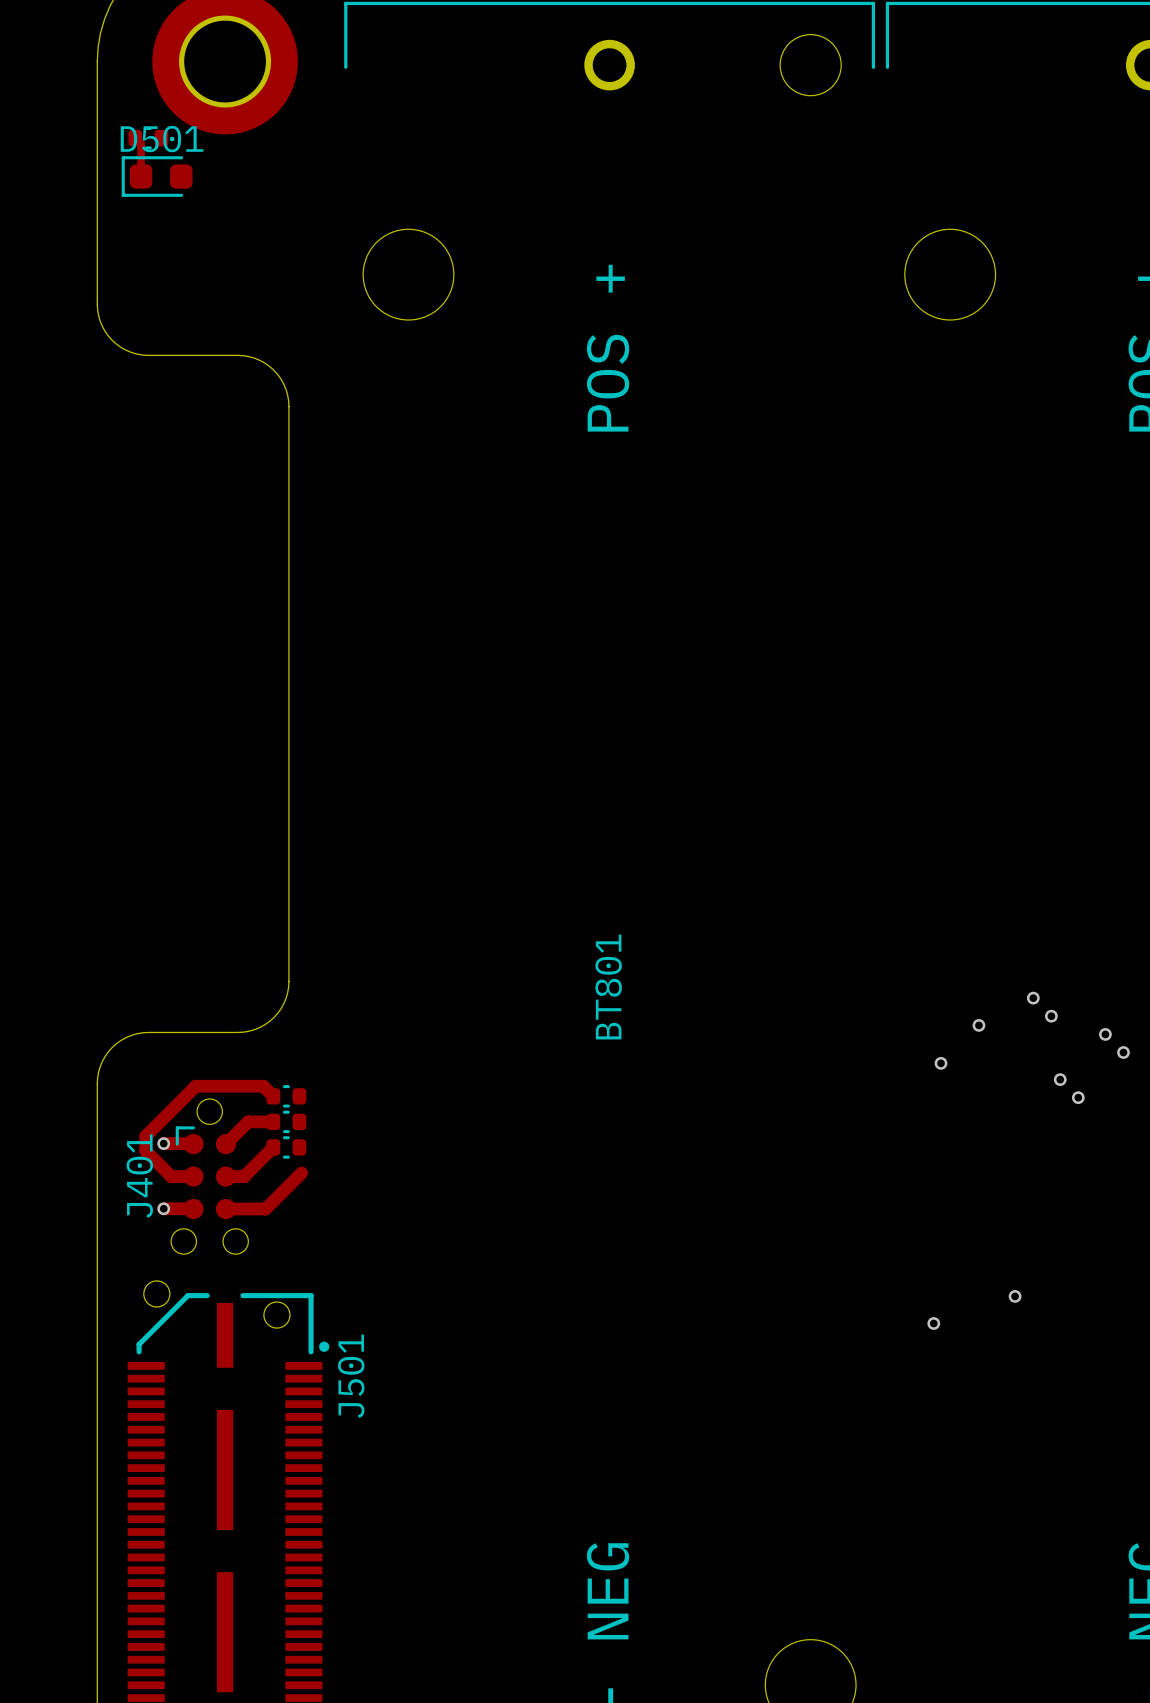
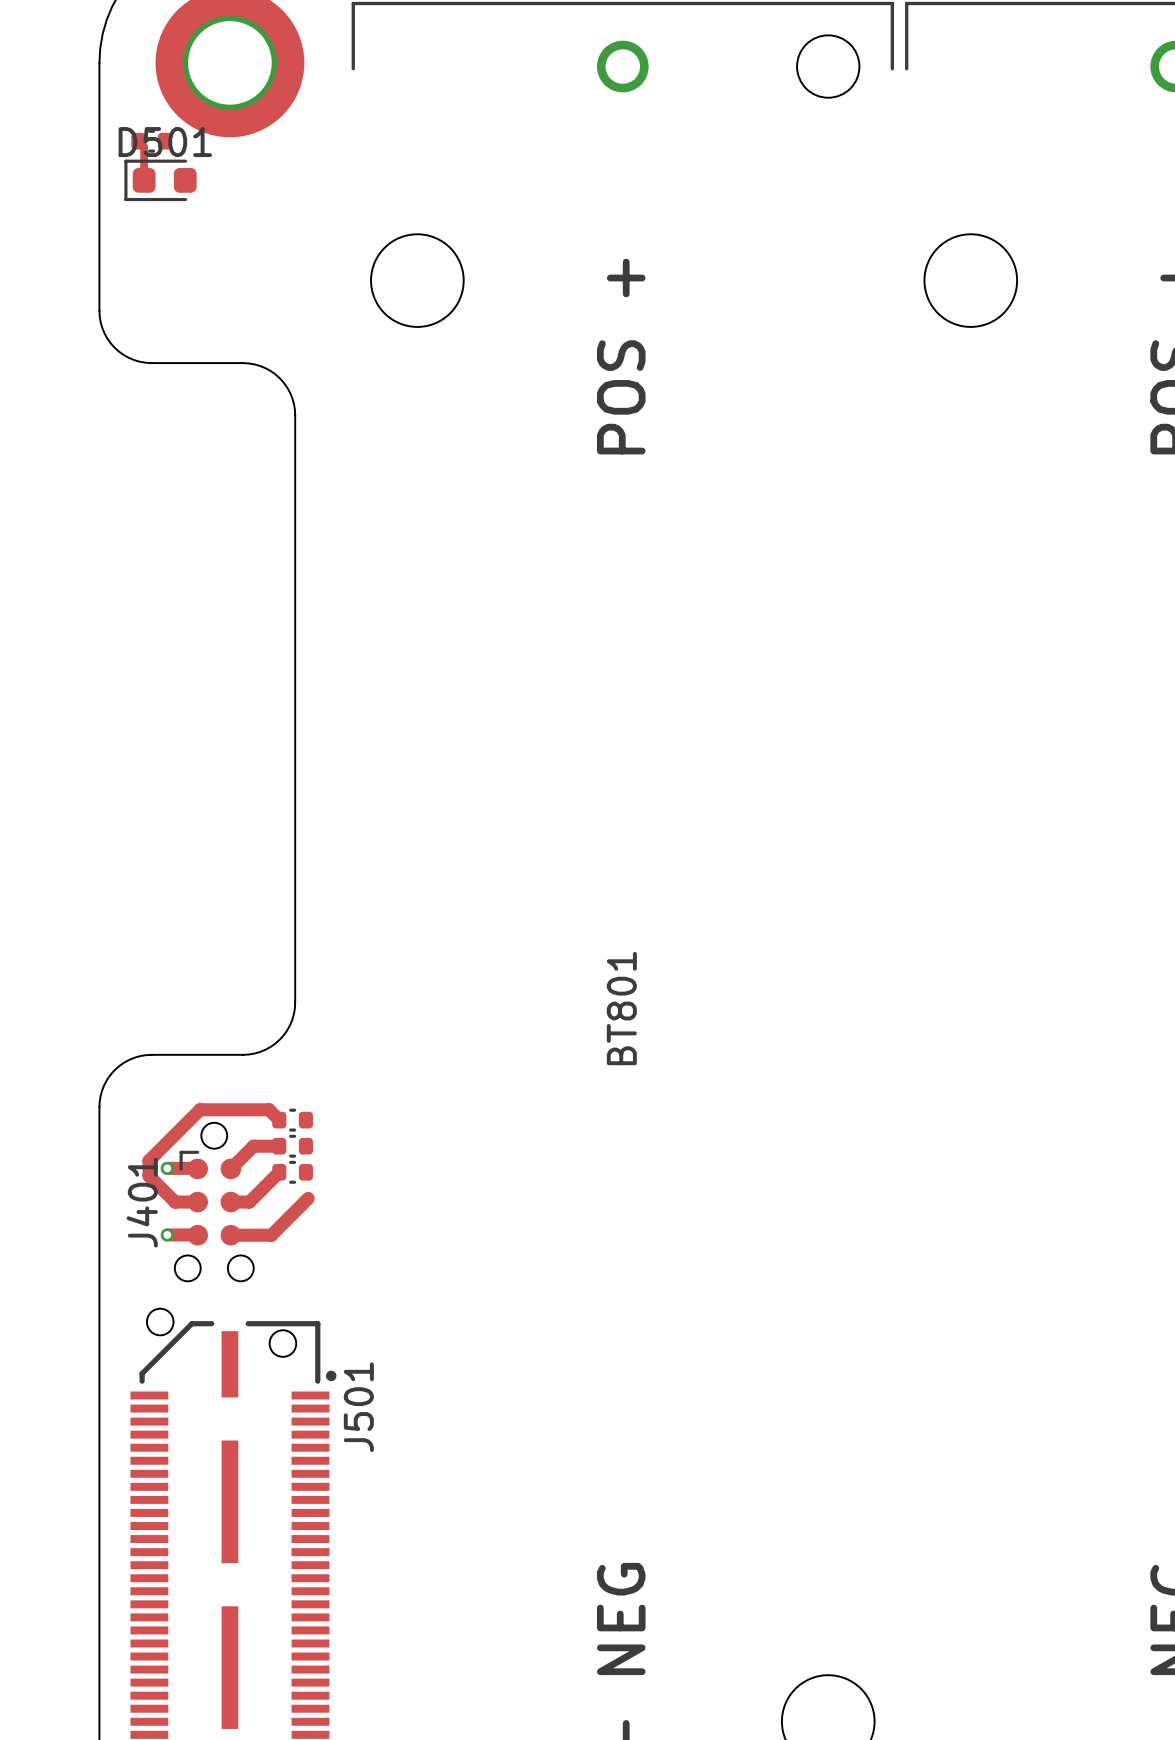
via: (1033, 998) -> none
via: (1051, 1016) -> none
via: (978, 1025) -> none
via: (1105, 1034) -> none
via: (1123, 1052) -> none
via: (941, 1063) -> none
via: (1060, 1079) -> none
via: (1078, 1097) -> none
via: (1015, 1296) -> none
via: (933, 1323) -> none

